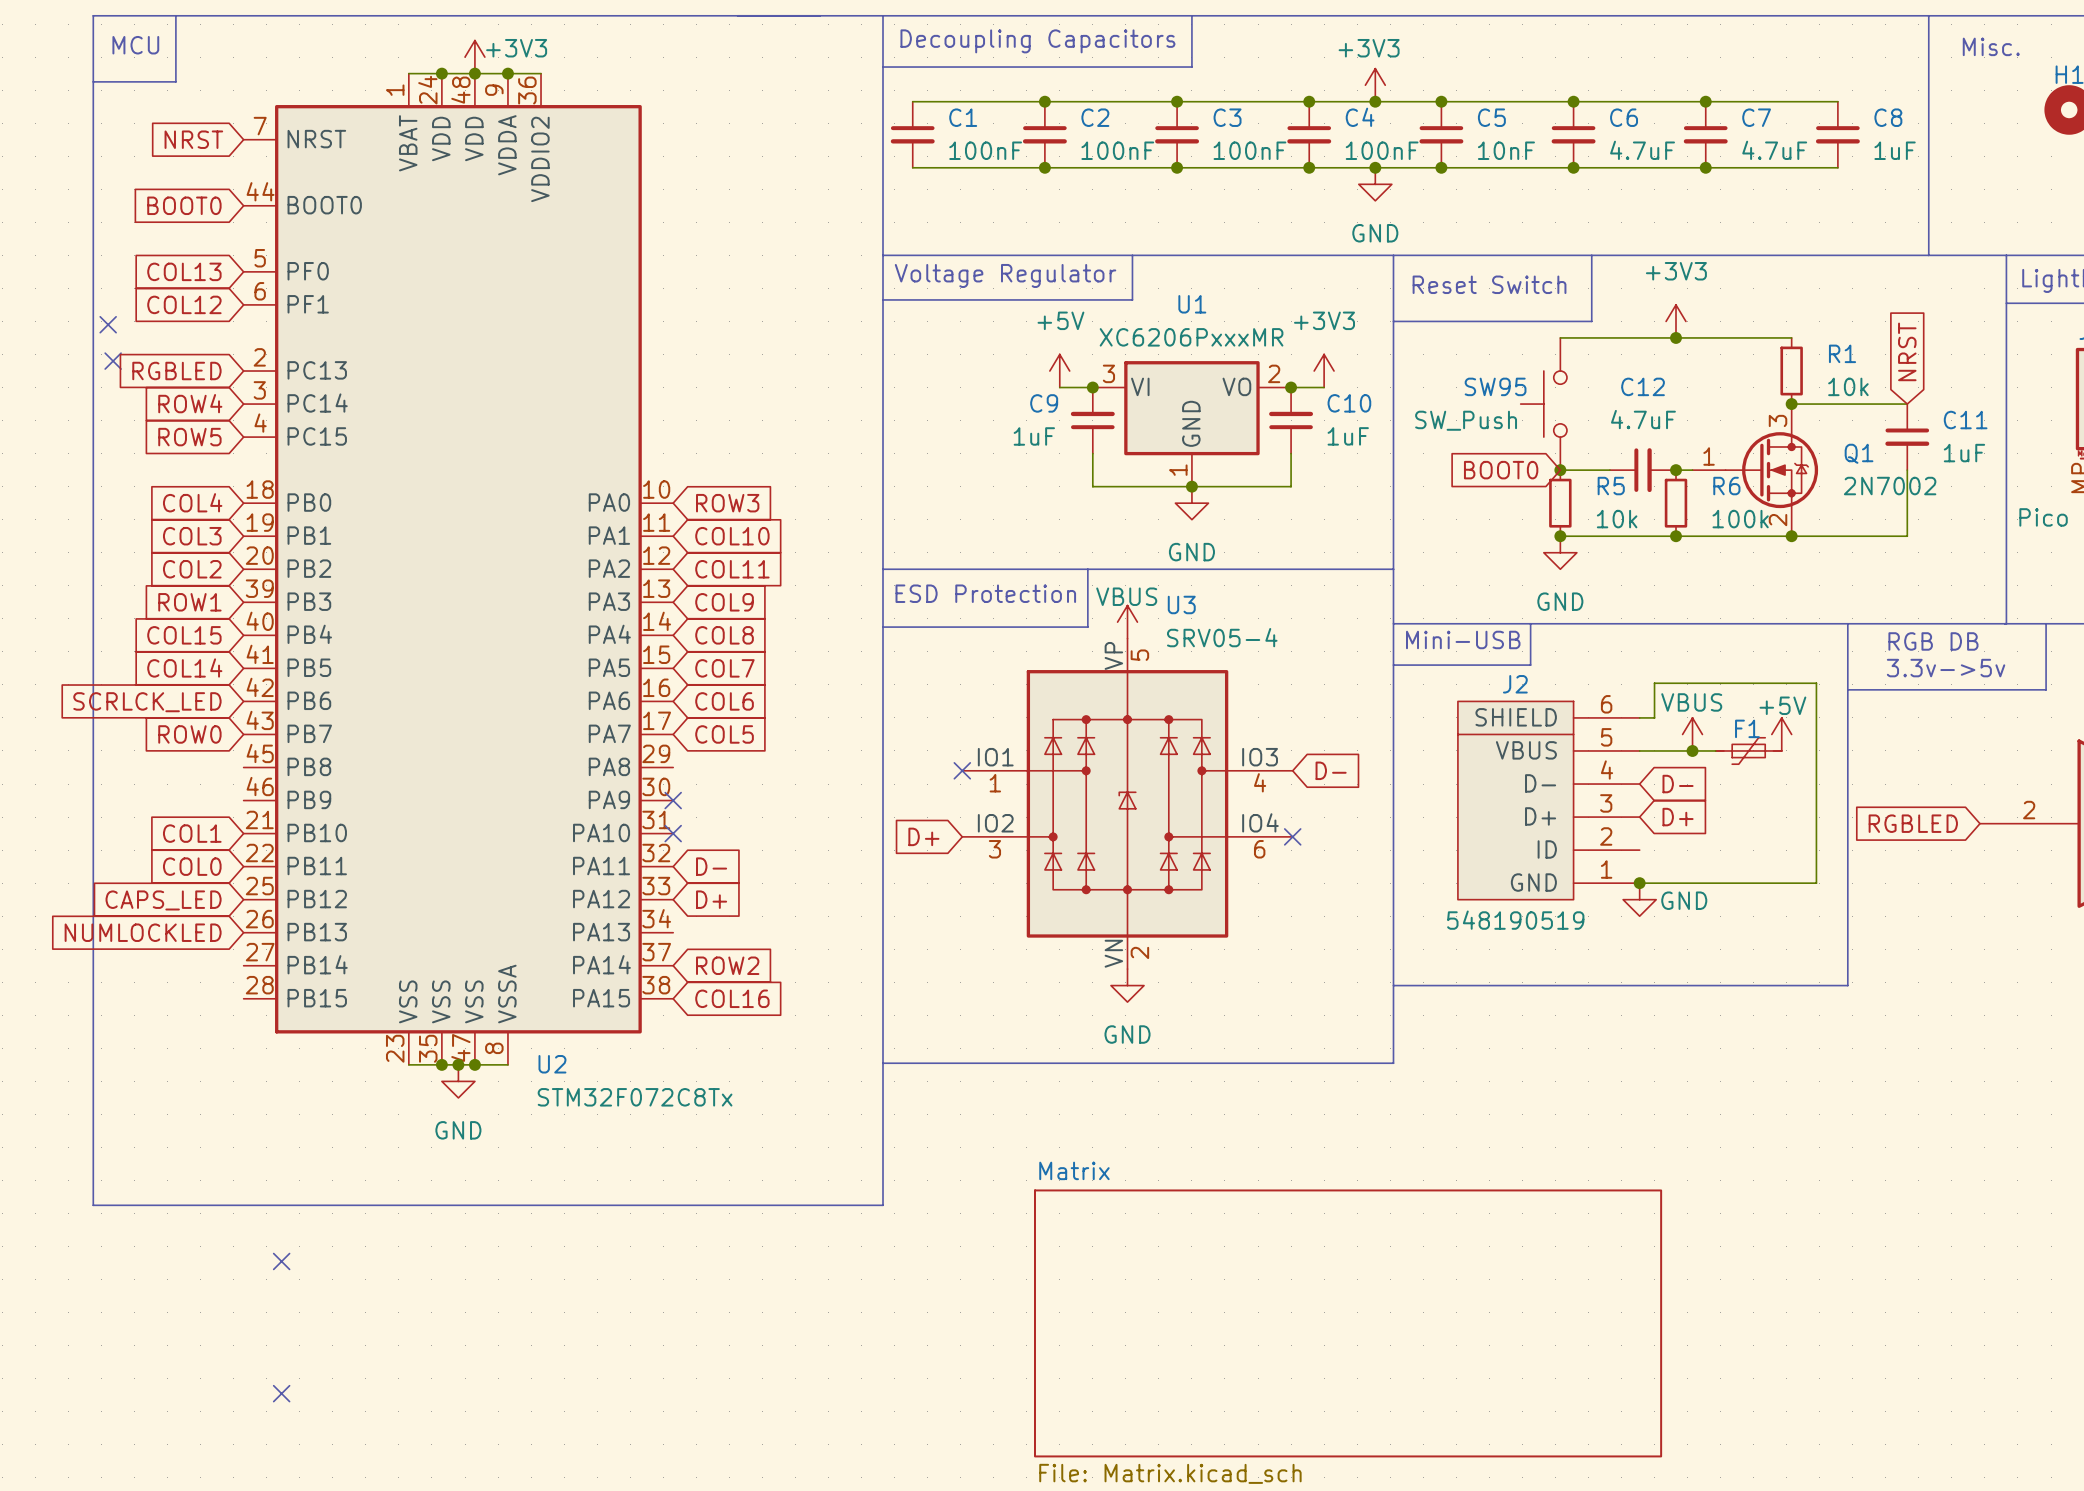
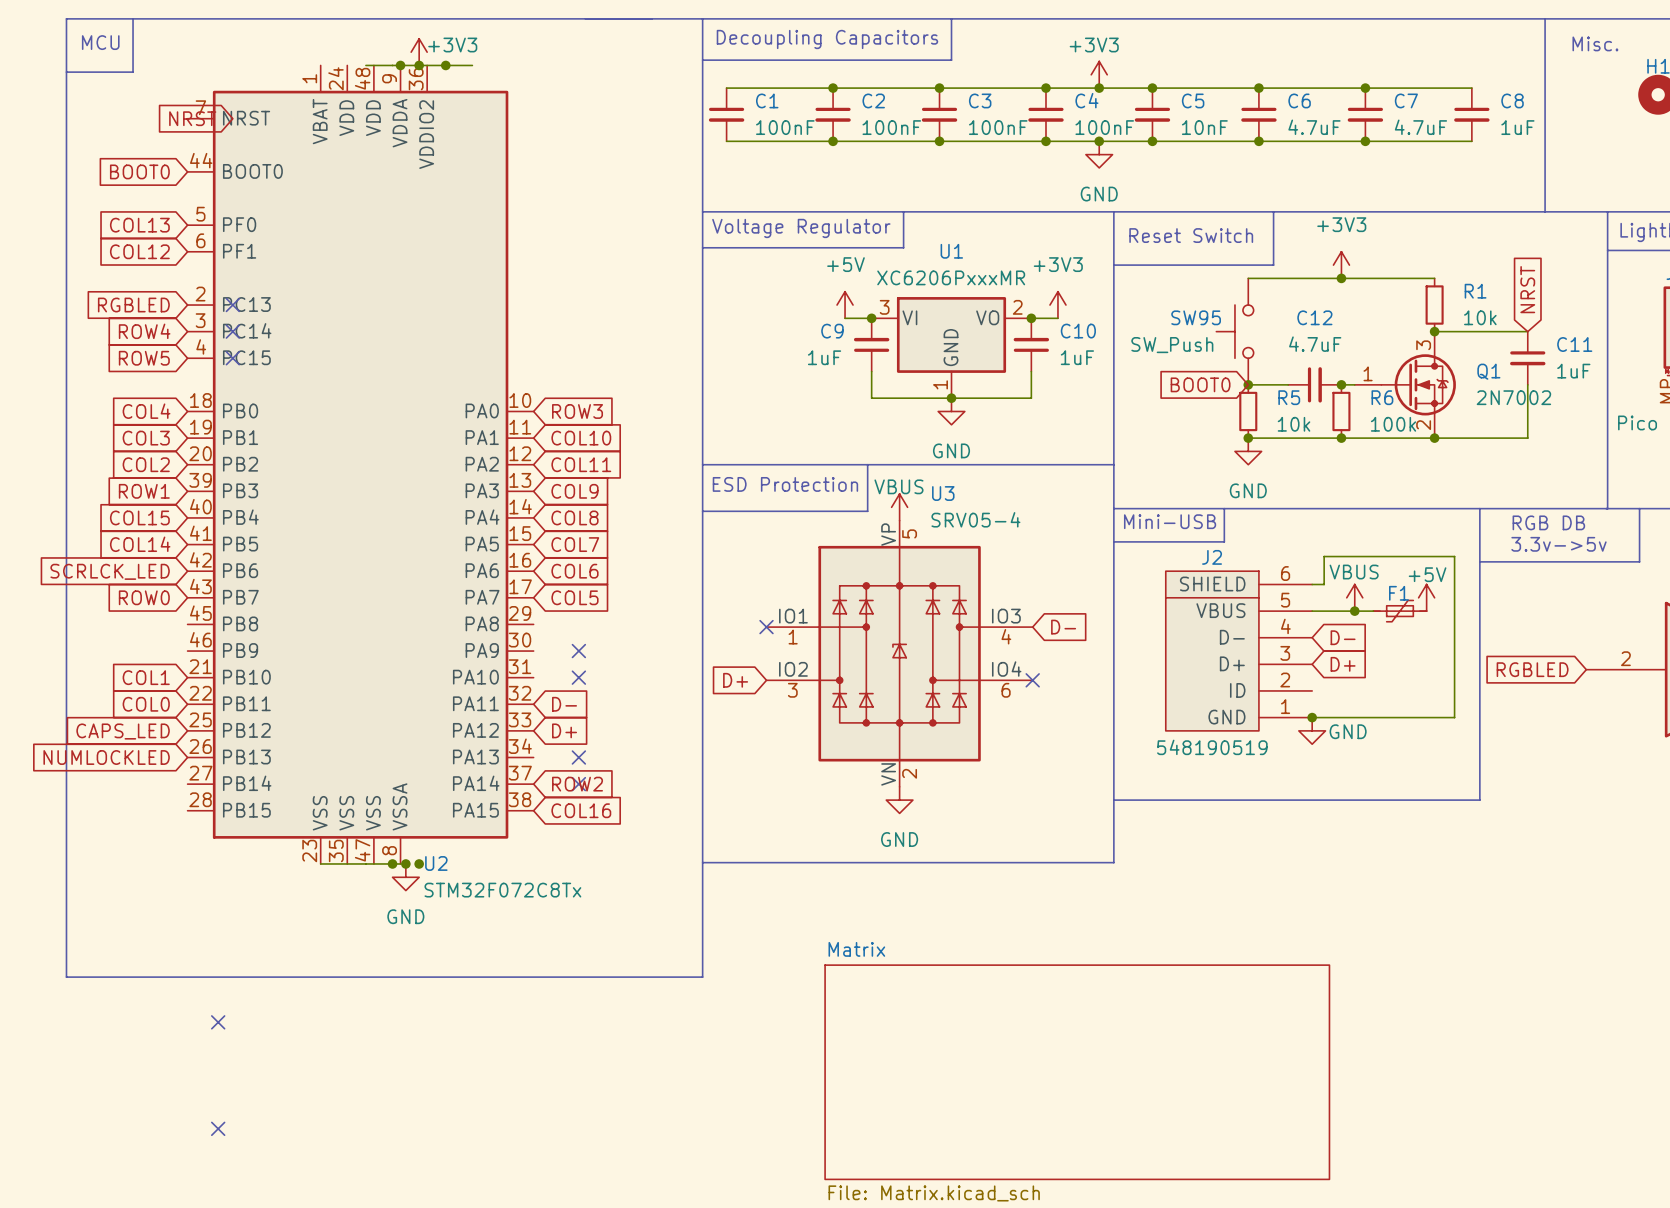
power symbol position: +3V3 (474, 57) -> +3V3 (419, 52)
wire: (408, 73) (465, 73) -> (427, 65) (472, 65)
junction: (441, 73) -> none
junction: (474, 73) -> none
junction: none -> (419, 65)
junction: none -> (445, 65)
global label position: NRST (193, 139) -> NRST (192, 118)
no-connect mark: (108, 324) -> none
no-connect mark: (113, 361) -> none
no-connect mark: none -> (232, 305)
no-connect mark: none -> (232, 331)
no-connect mark: none -> (232, 358)
no-connect mark: (673, 800) -> none
no-connect mark: none -> (578, 651)
no-connect mark: (673, 833) -> none
no-connect mark: none -> (578, 677)
no-connect mark: none -> (578, 757)
no-connect mark: none -> (578, 784)
junction: (441, 1064) -> none
junction: (458, 1064) -> none
junction: (474, 1064) -> none
junction: none -> (392, 863)
junction: none -> (405, 863)
junction: none -> (419, 863)
power symbol position: GND (458, 1081) -> GND (405, 877)

